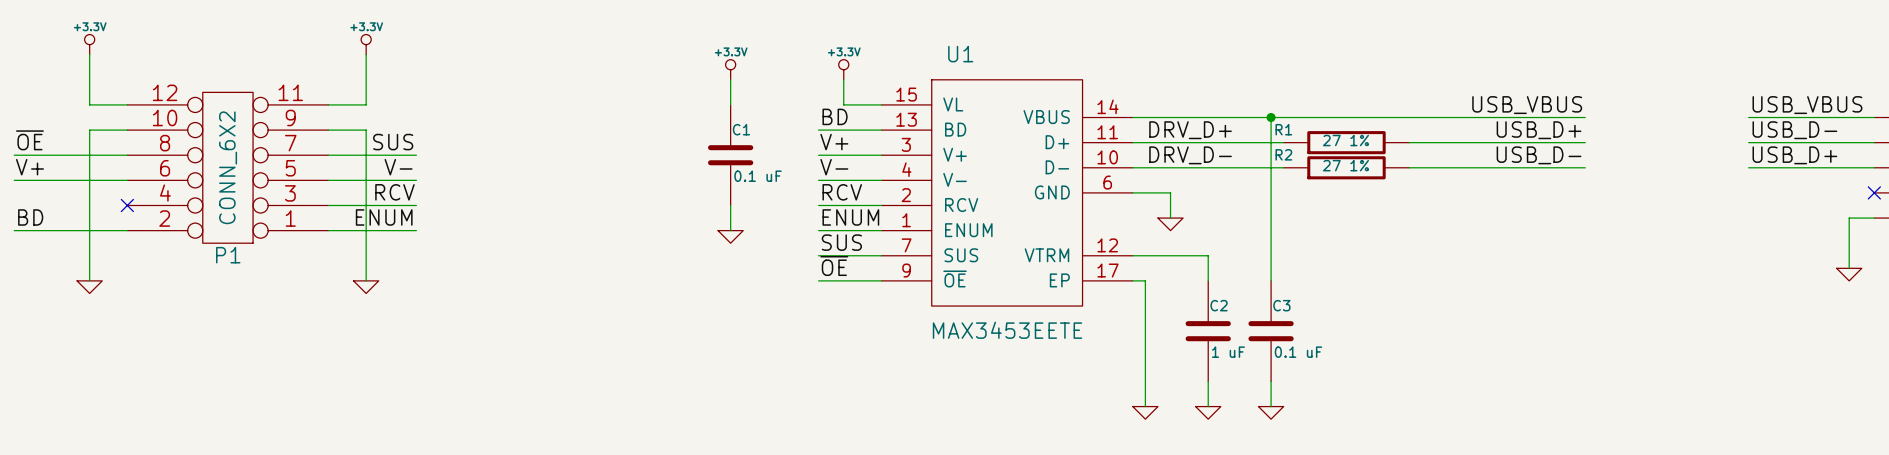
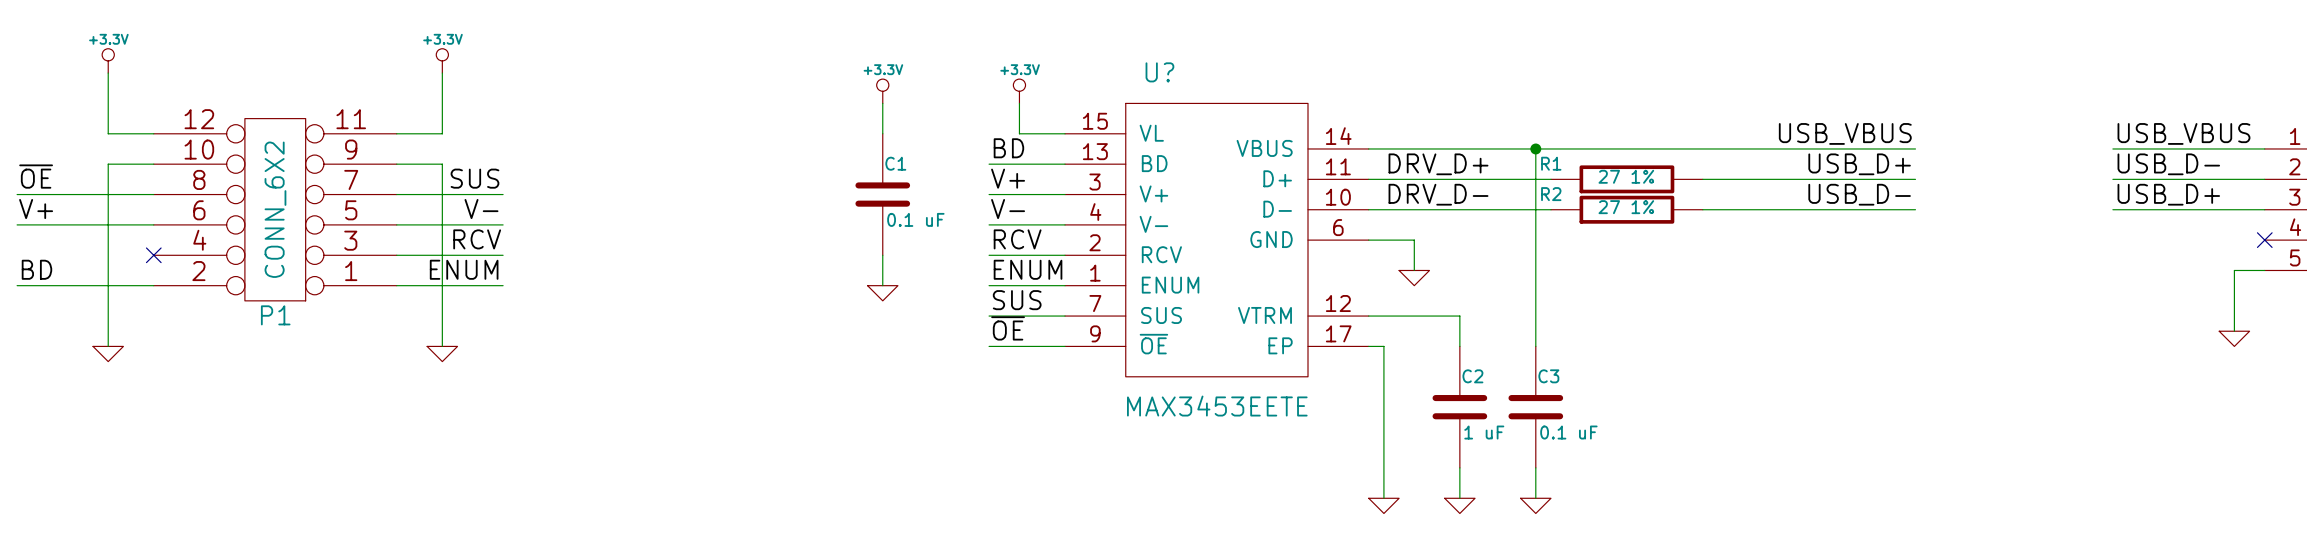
U1 name: U1 (960, 54) -> U? (1159, 72)

